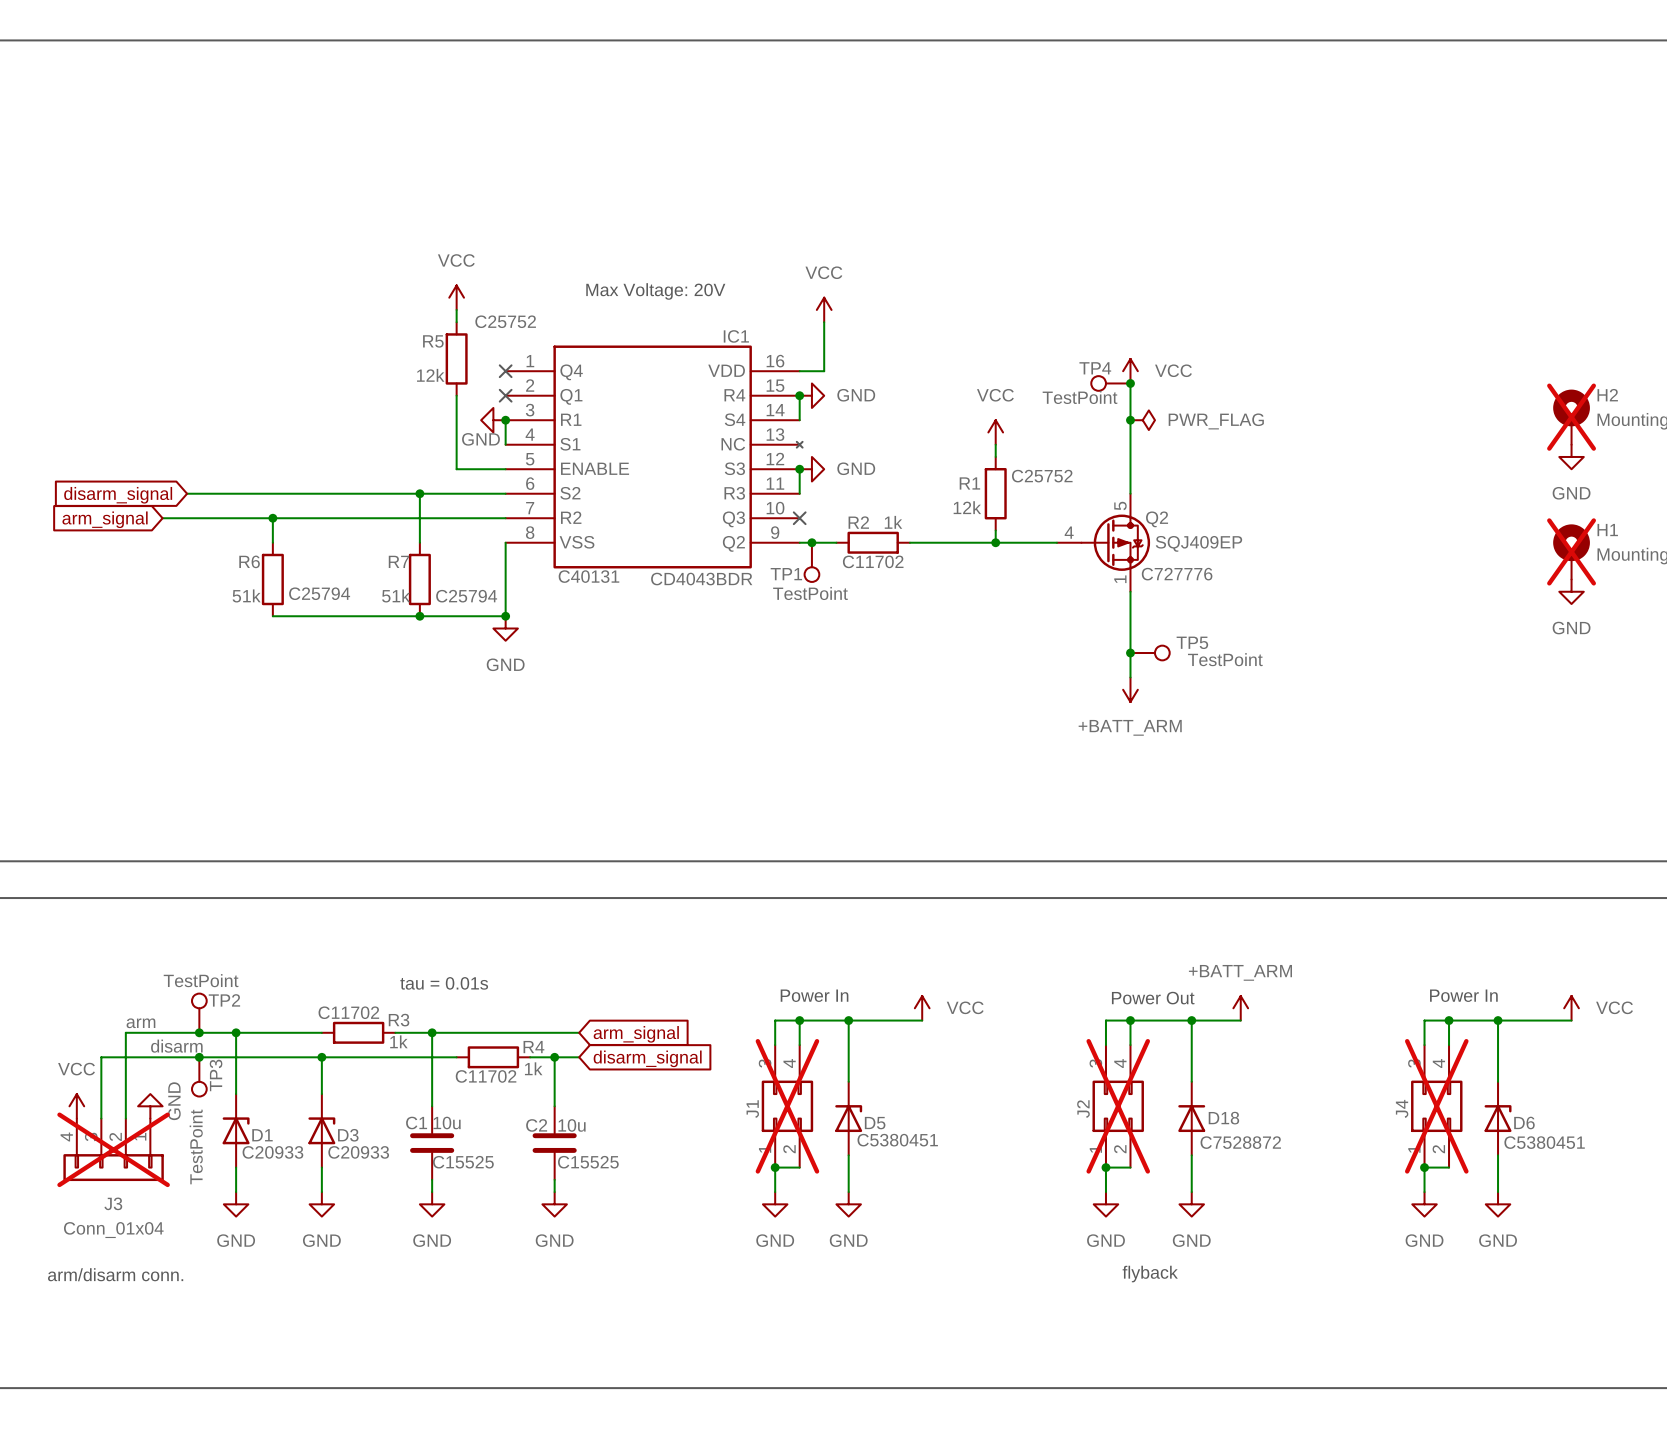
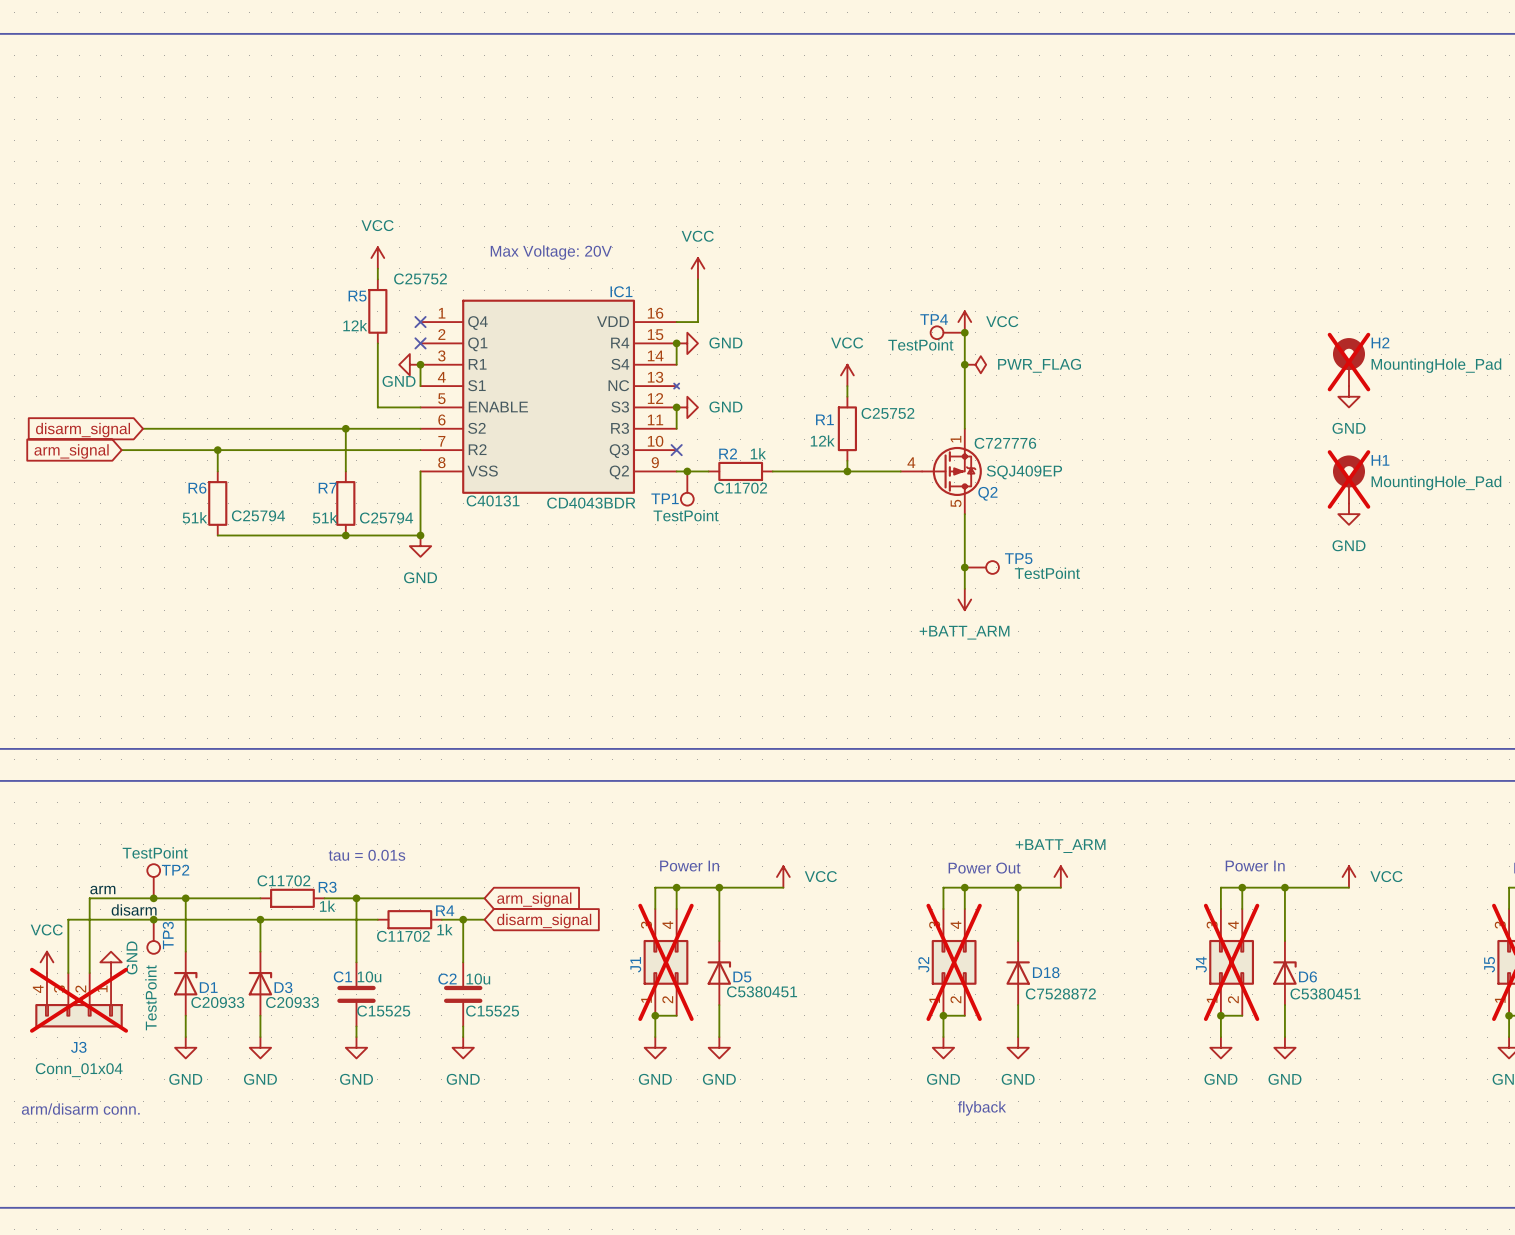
Q2 flip: as is (1115, 542) -> up-down (951, 471)

